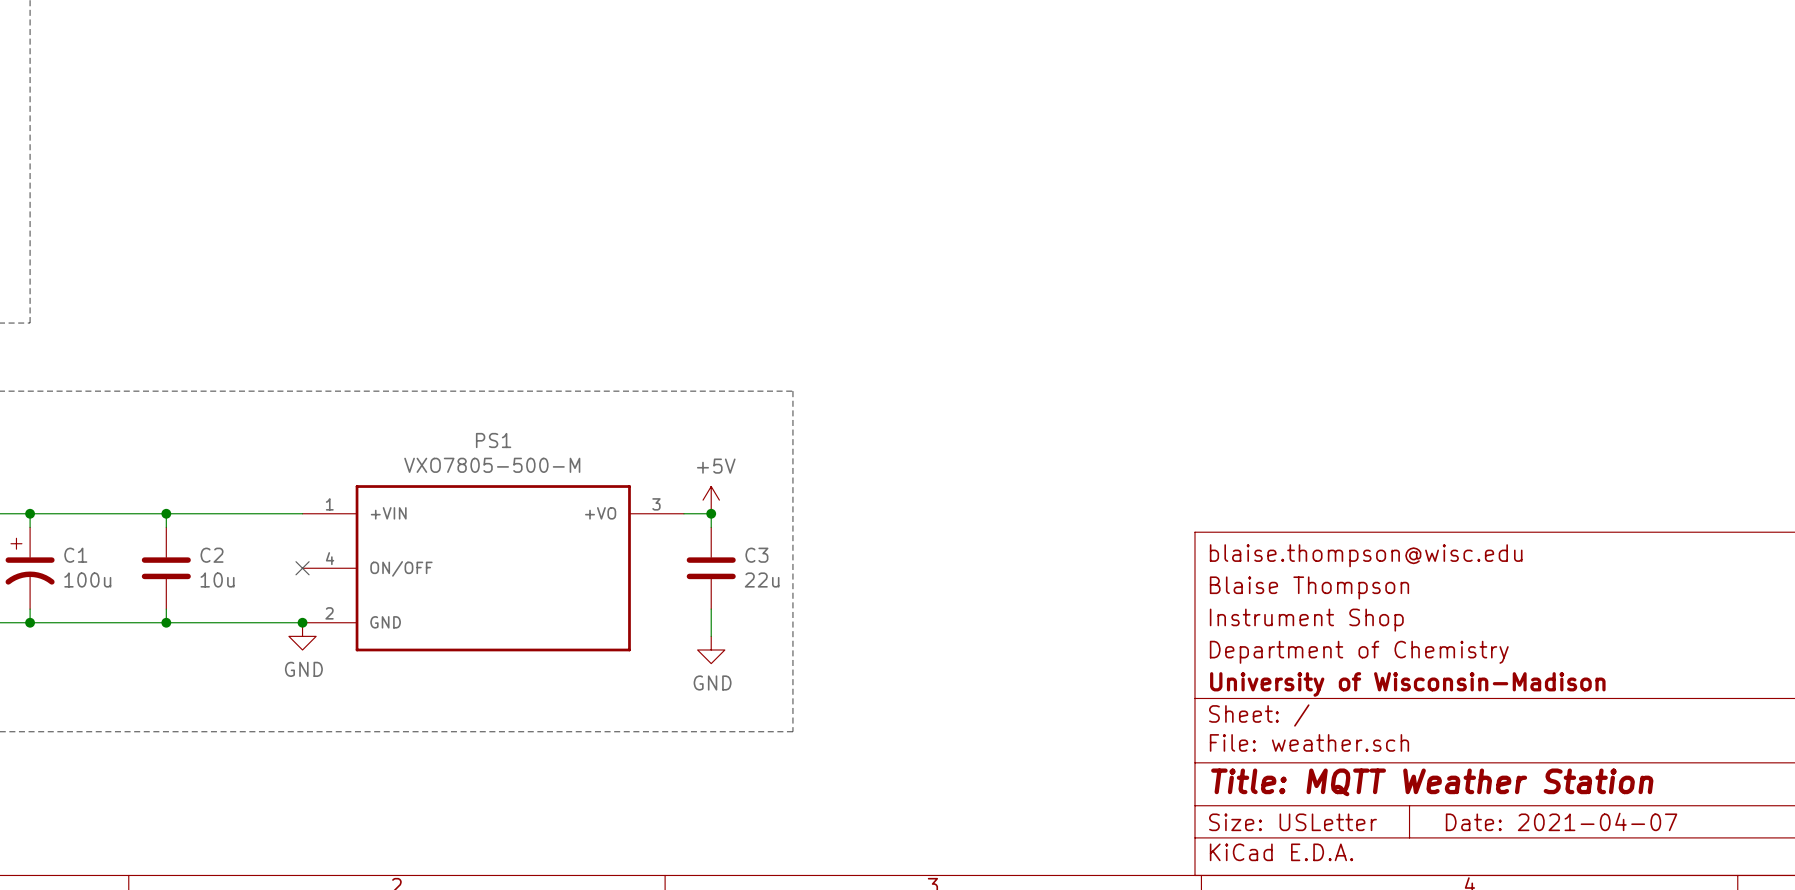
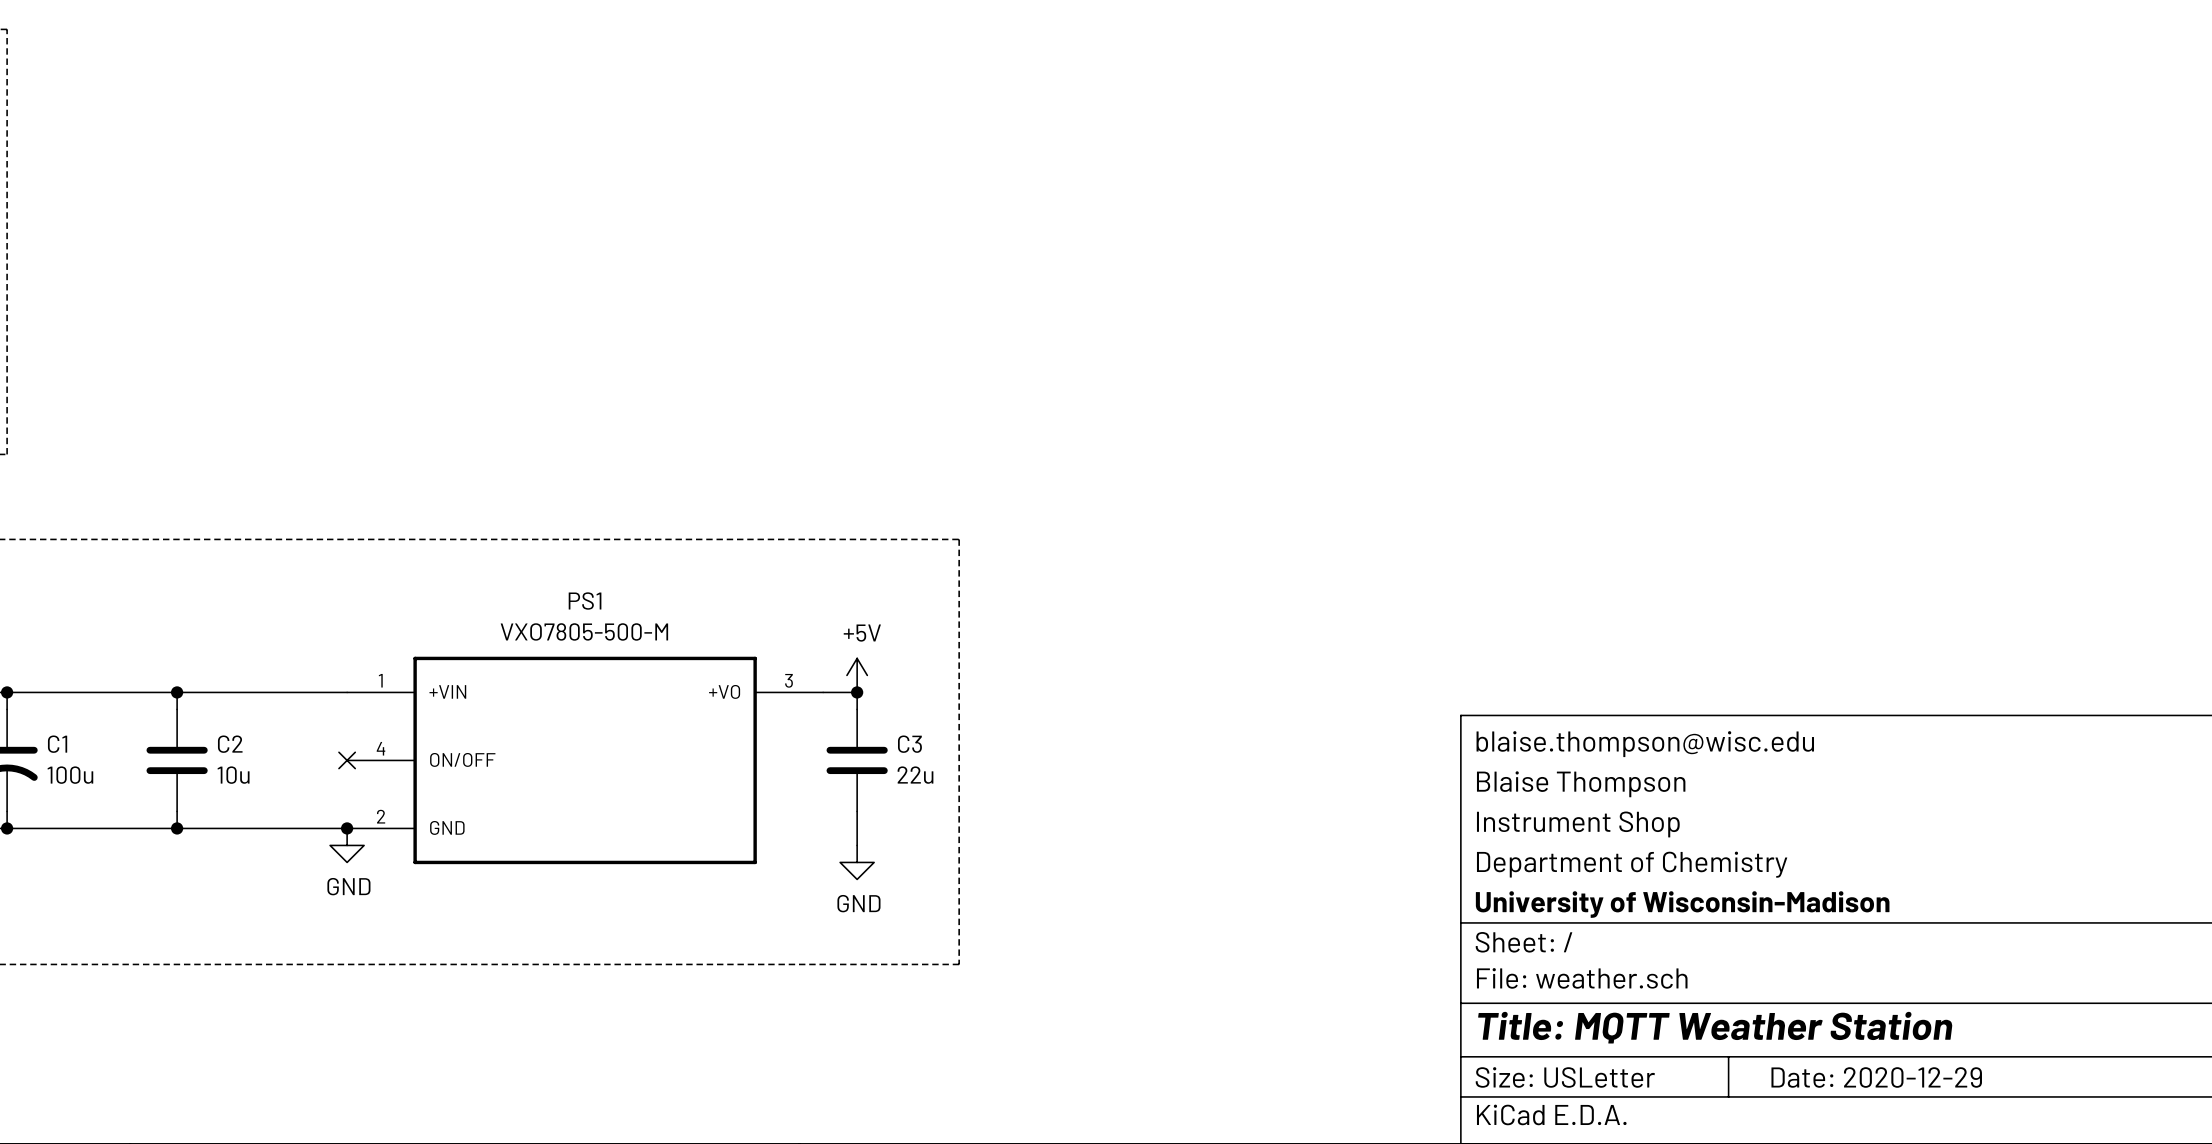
title block: Date: 2021-04-07 (1561, 821) -> Date: 2020-12-29 (1876, 1077)

